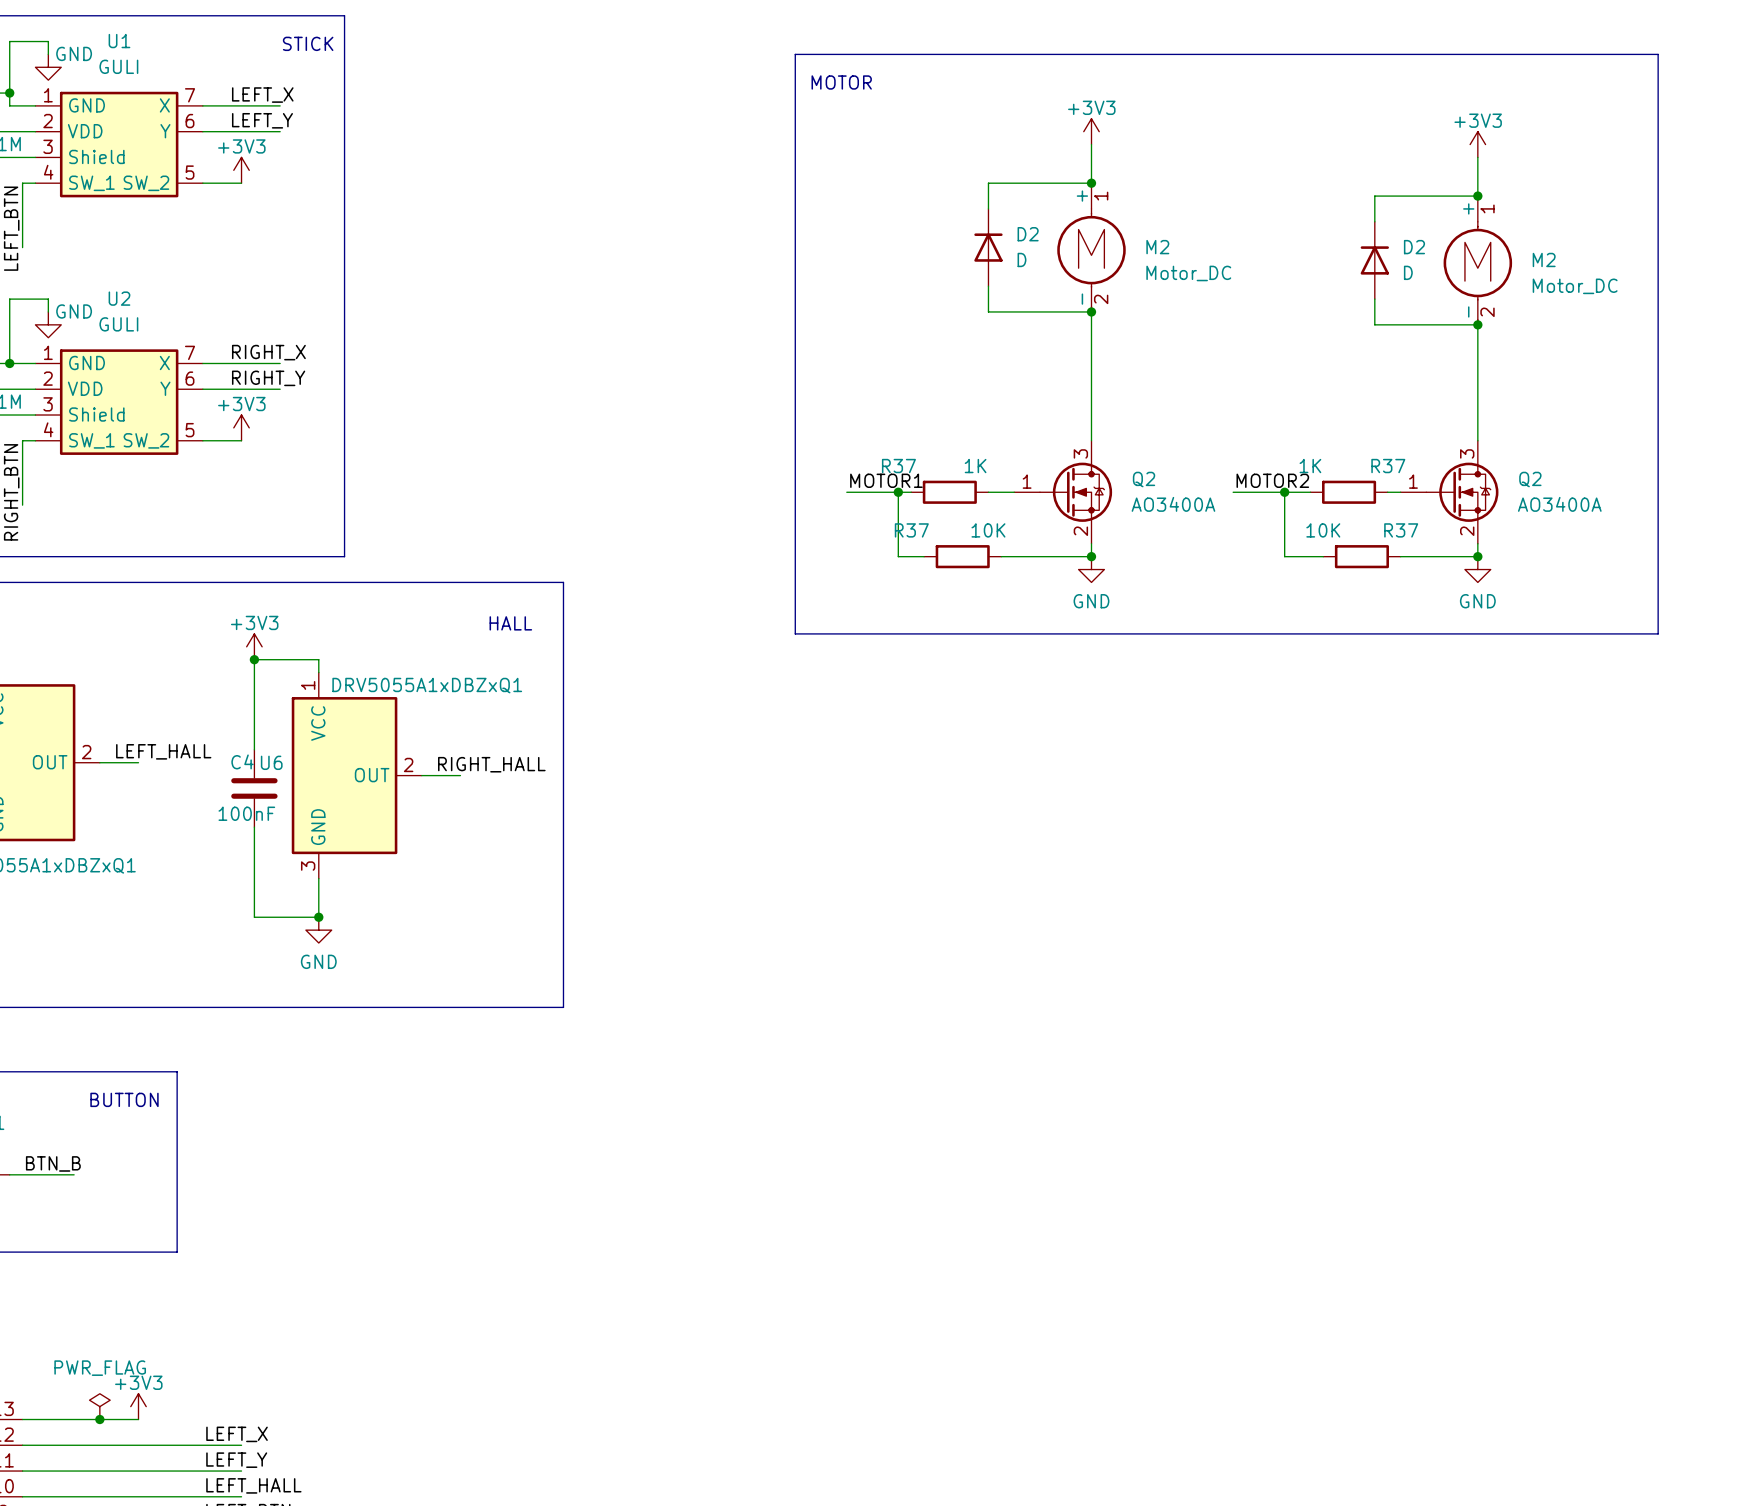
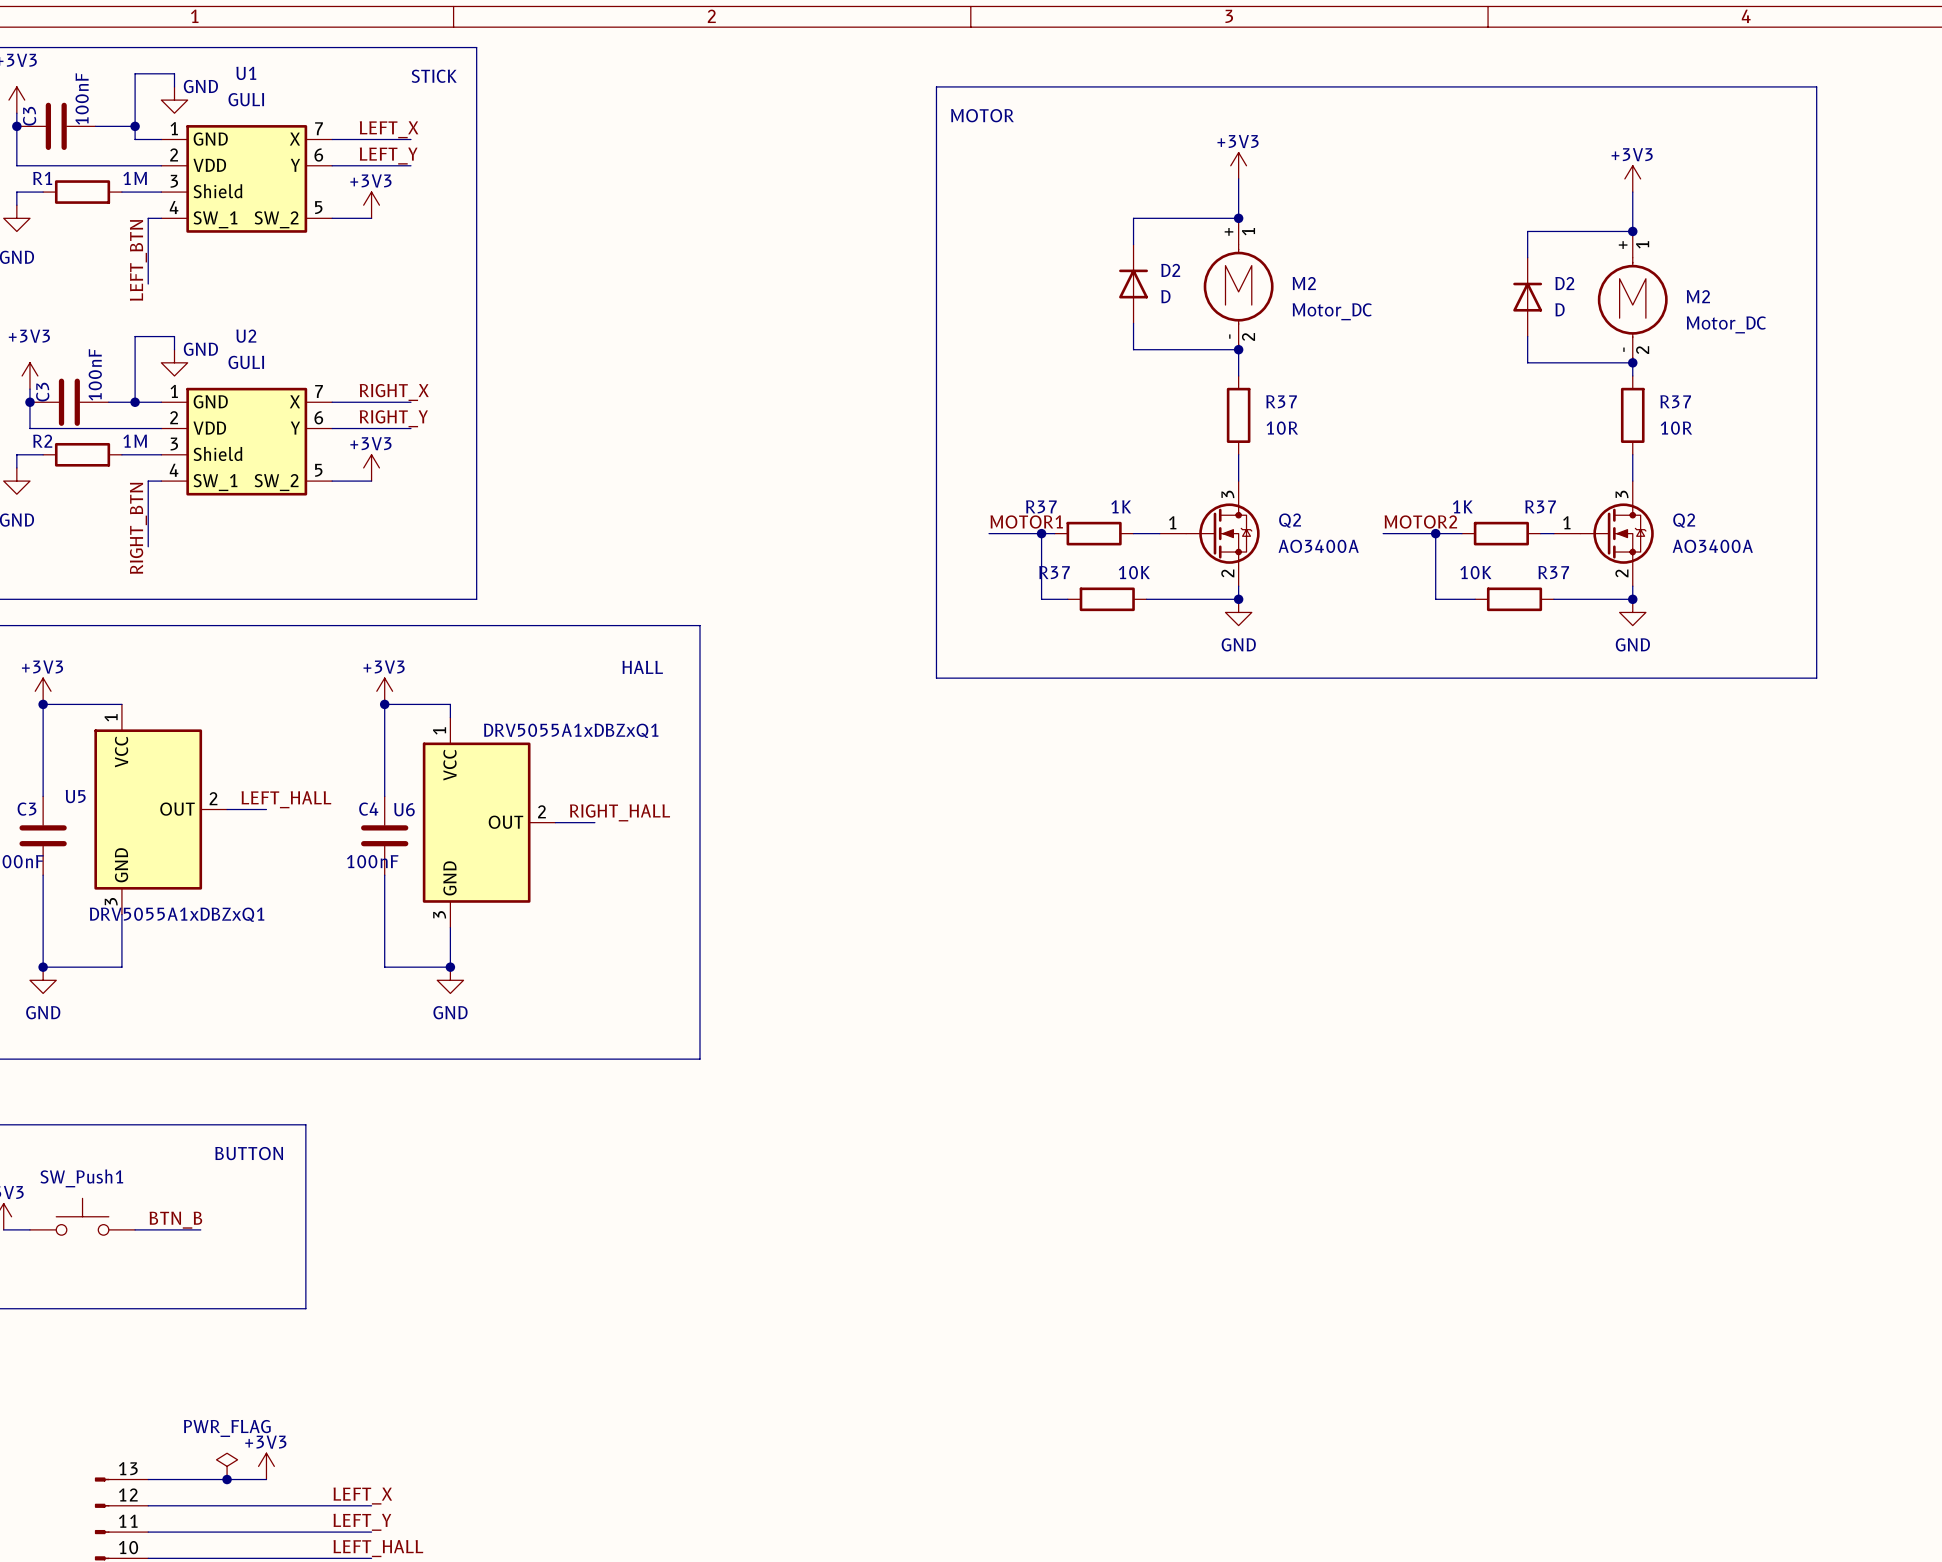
wire: (1091, 337) (1091, 415) -> none
wire: (1477, 337) (1477, 415) -> none
R37: none -> 10R (1238, 415)
R37: none -> 10R (1632, 415)

